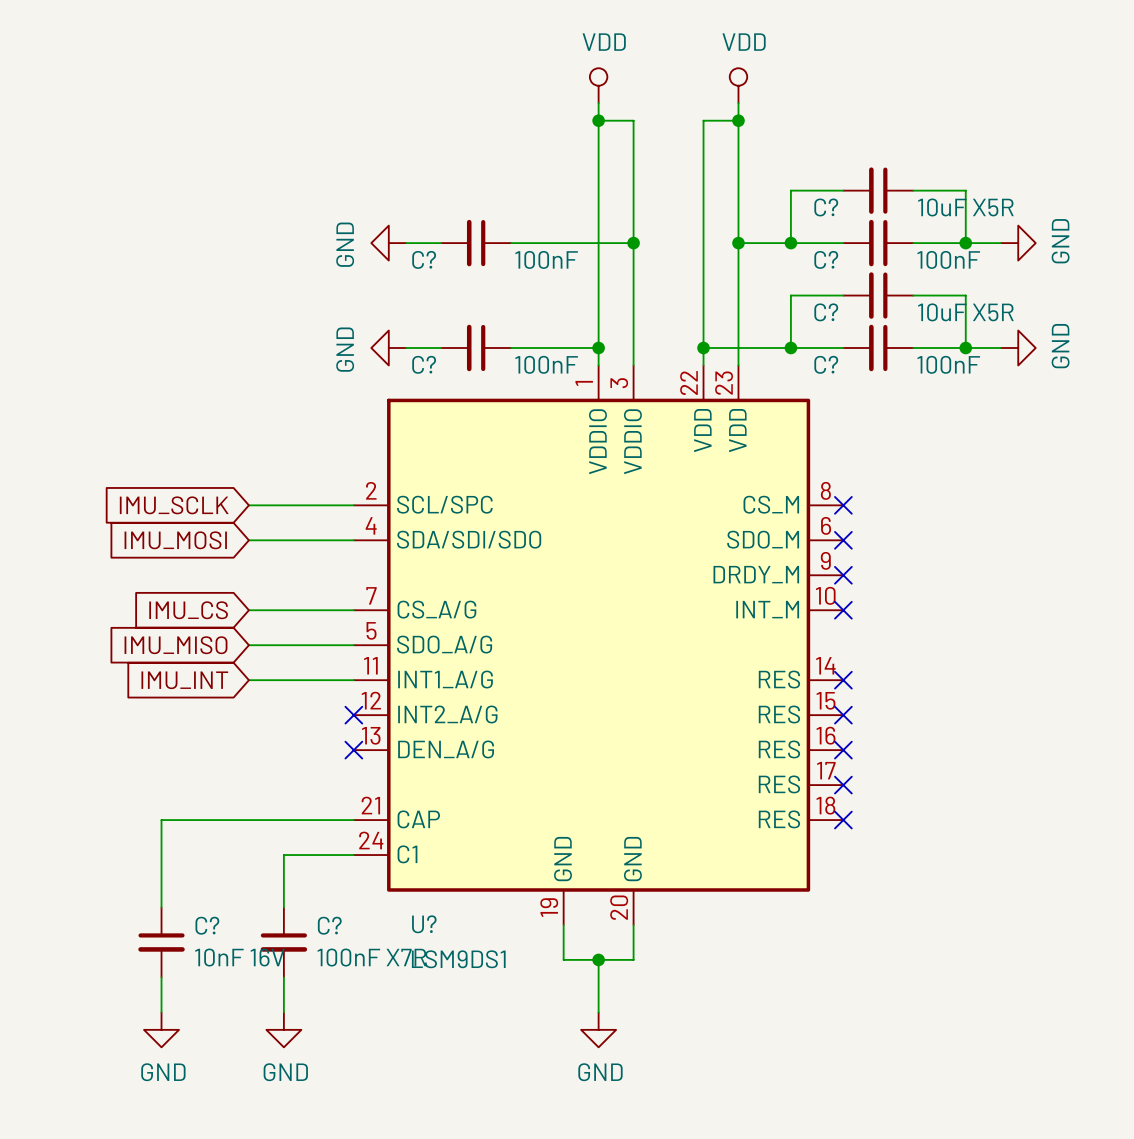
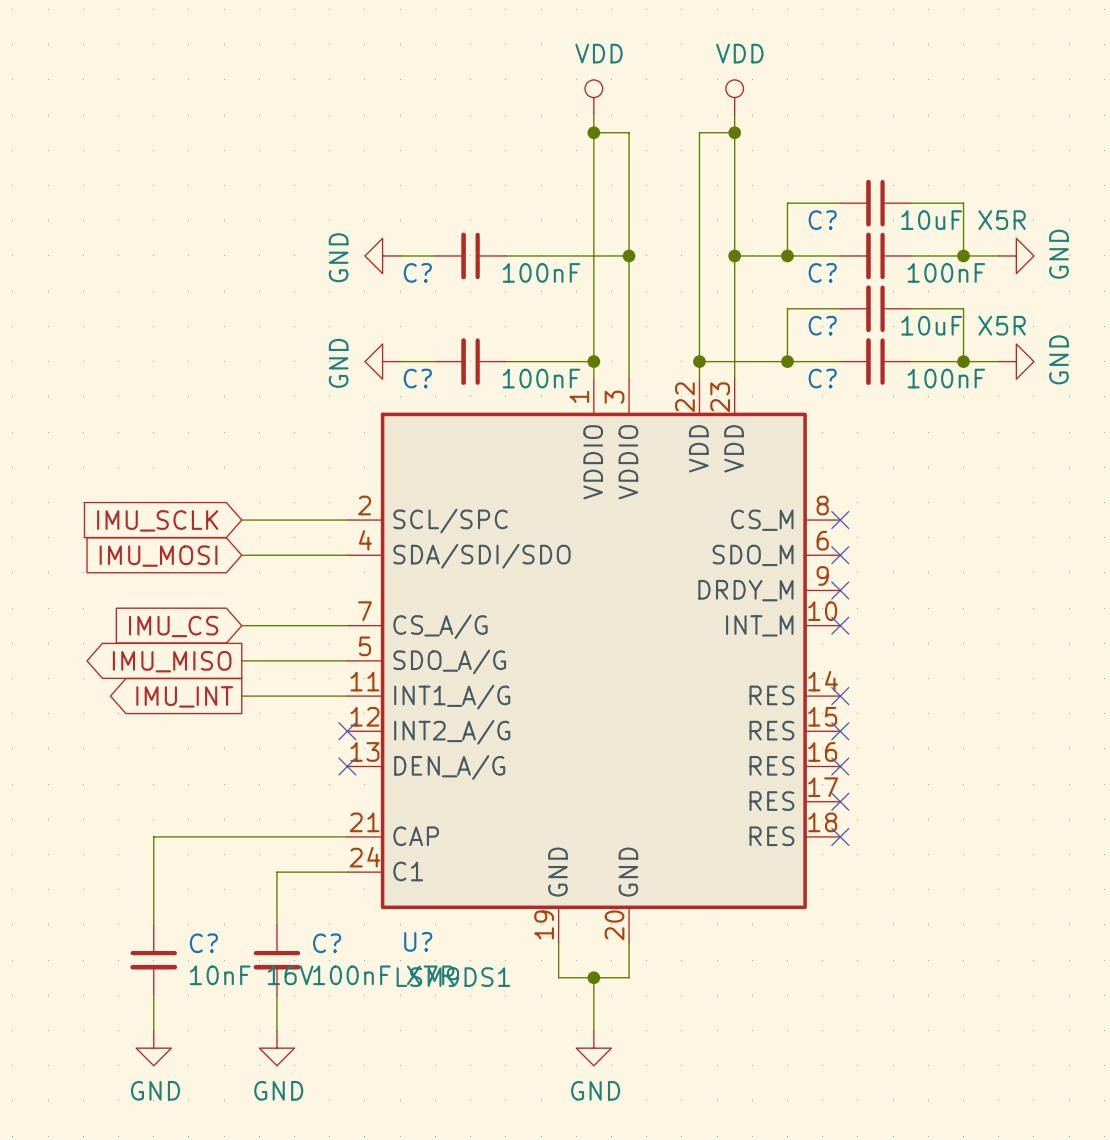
global label shape: input (176, 645) -> output (172, 661)
global label shape: input (184, 680) -> output (184, 696)

